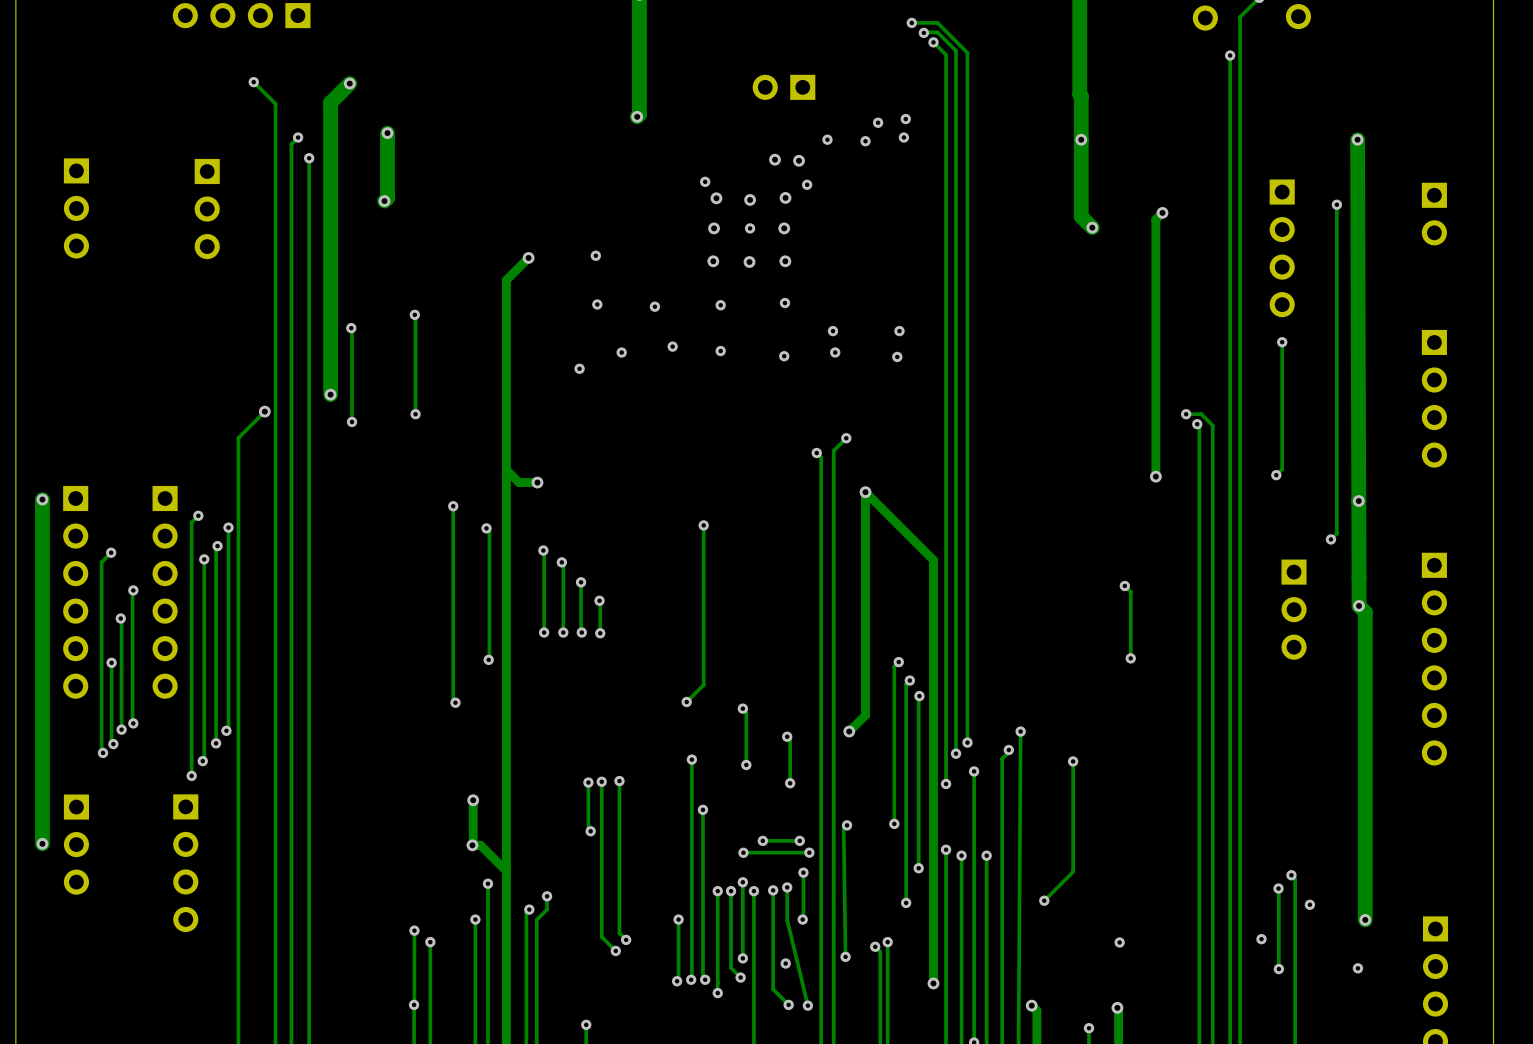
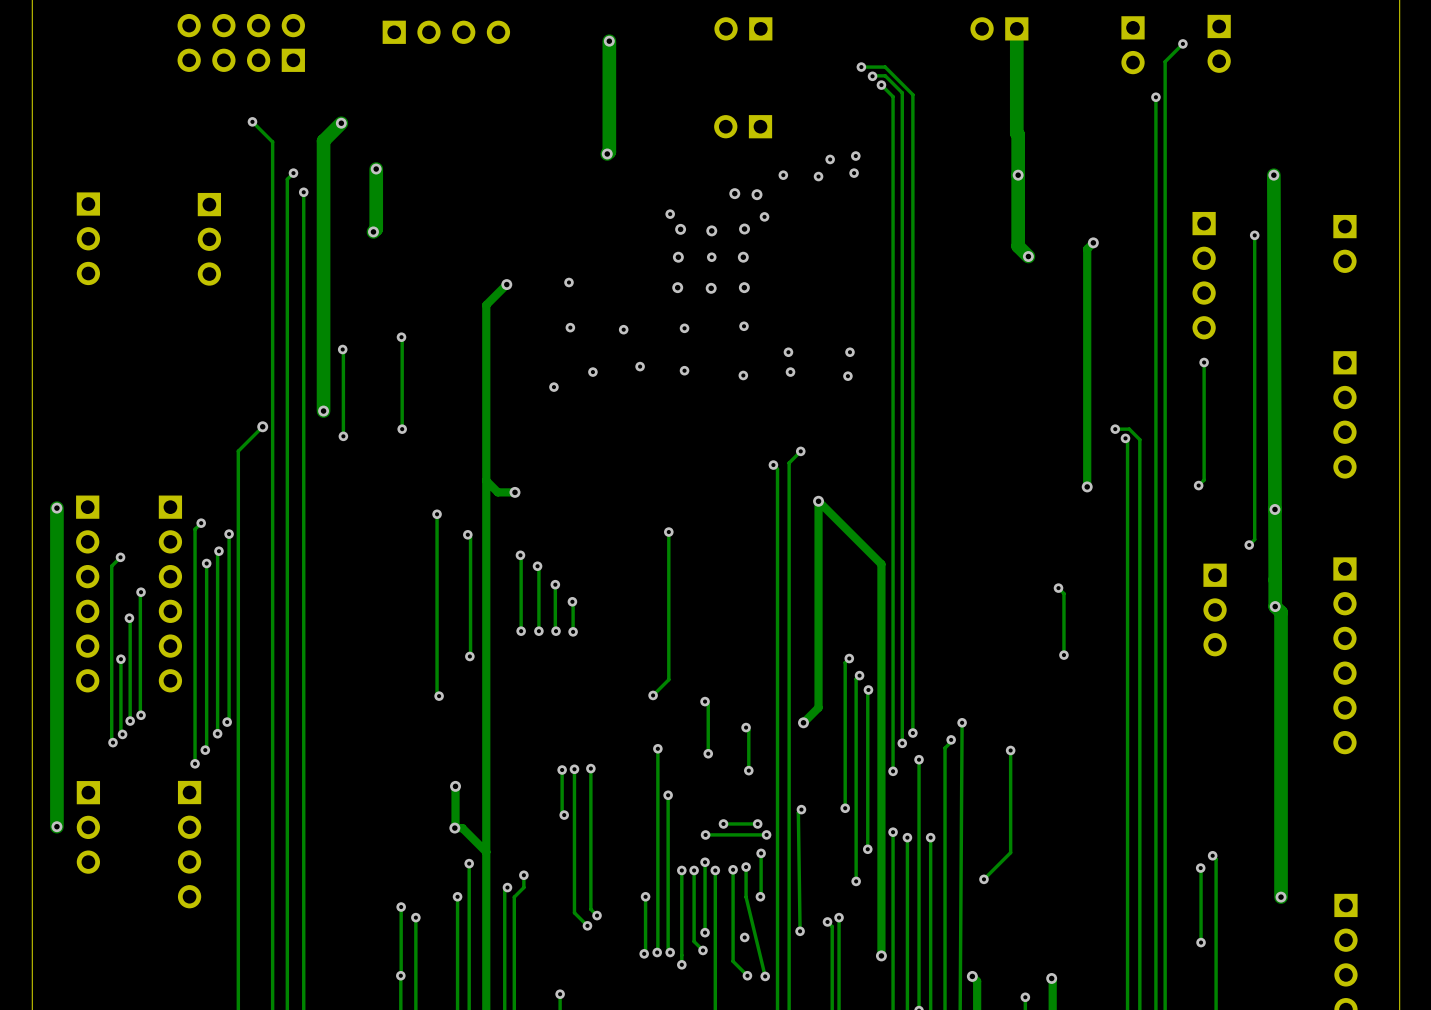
via: (1309, 904) -> none
via: (1261, 939) -> none
via: (1119, 942) -> none
via: (1357, 968) -> none

